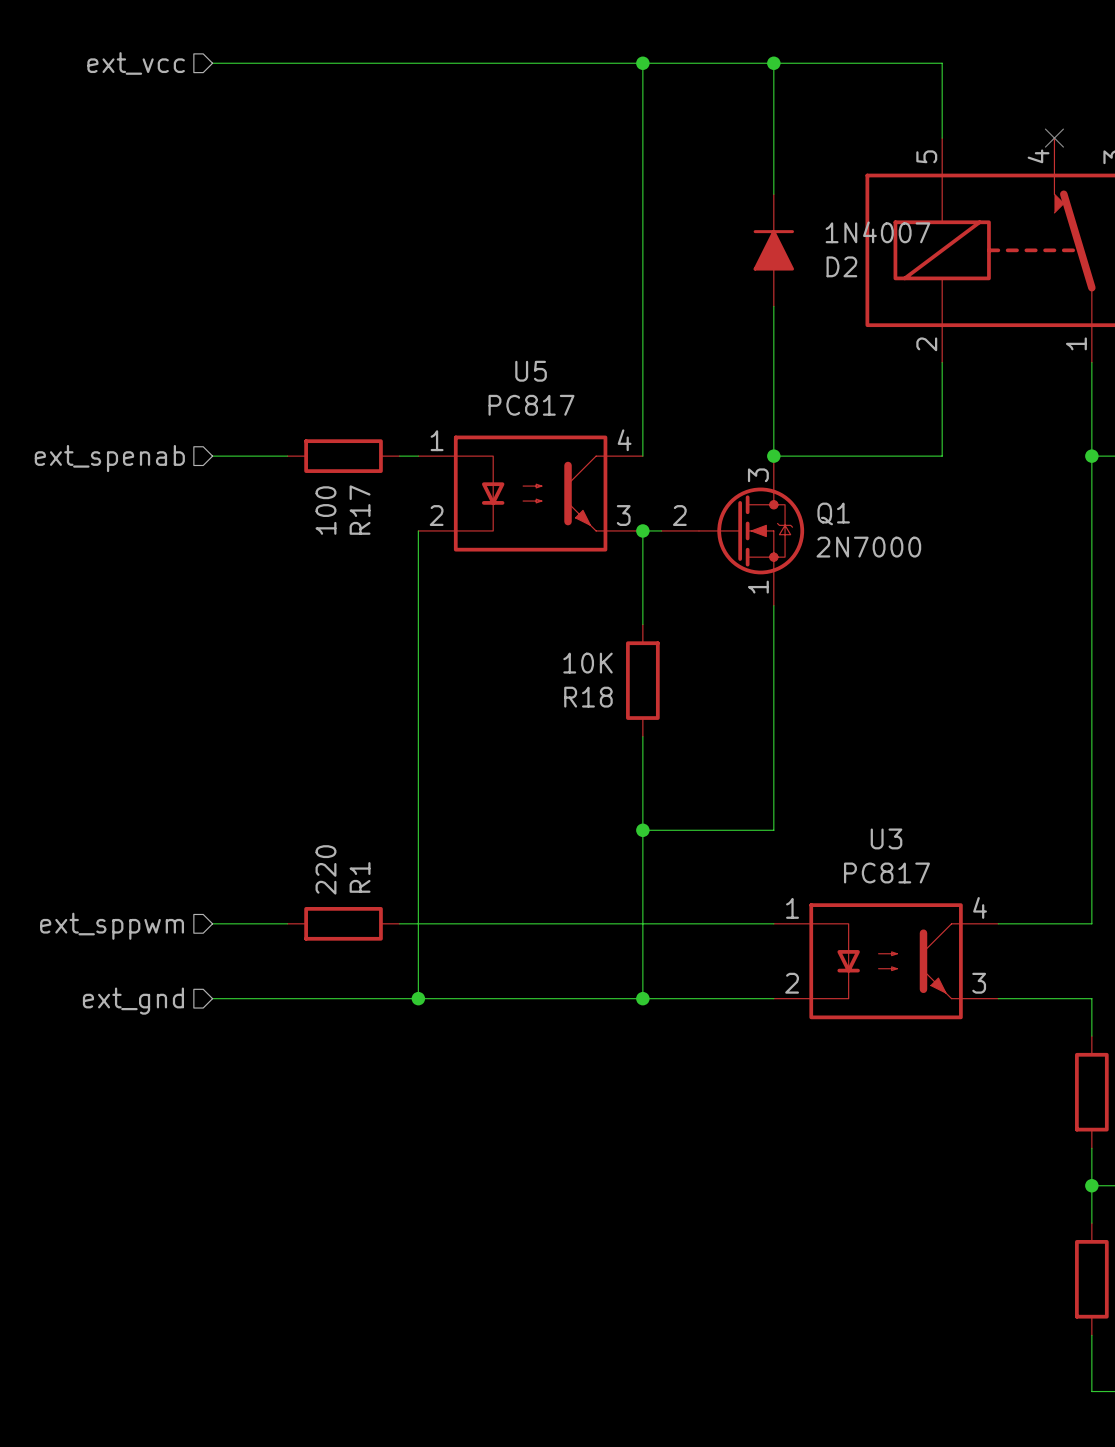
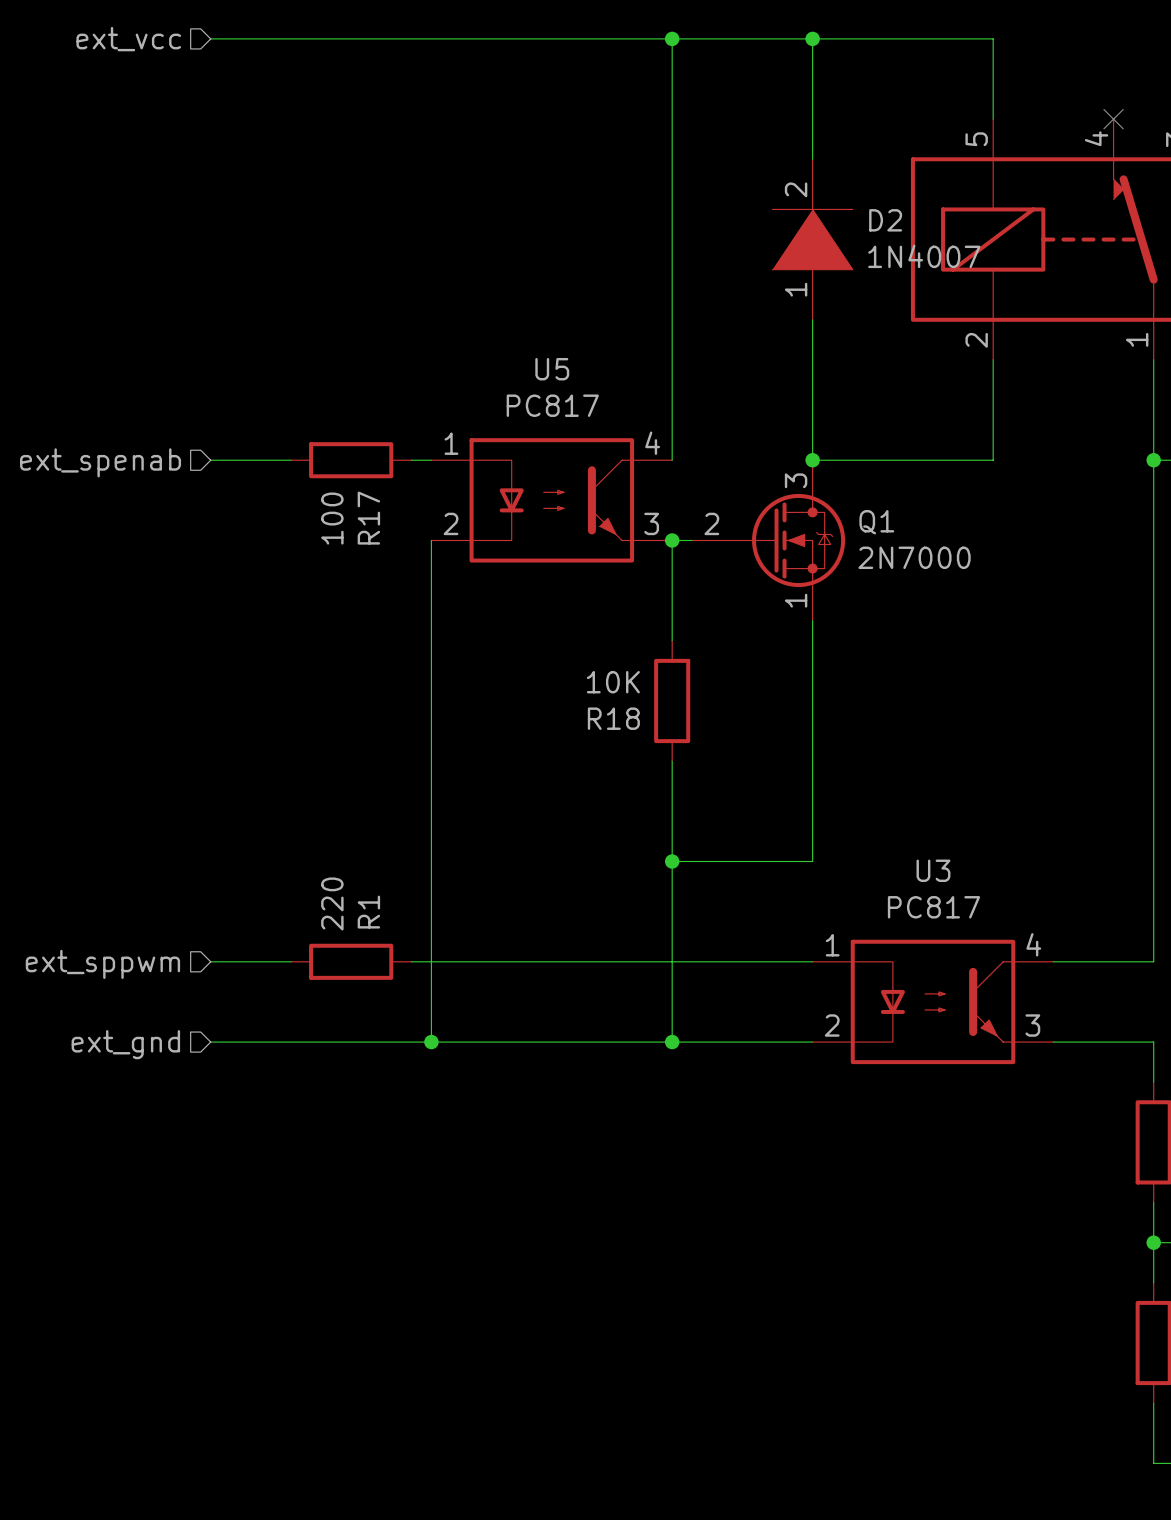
D2 symbol: [753, 194, 795, 307] -> [772, 159, 853, 320]
D2 value position: 1N4007 (877, 232) -> 1N4007 (924, 256)
D2 name position: D2 (841, 266) -> D2 (885, 220)

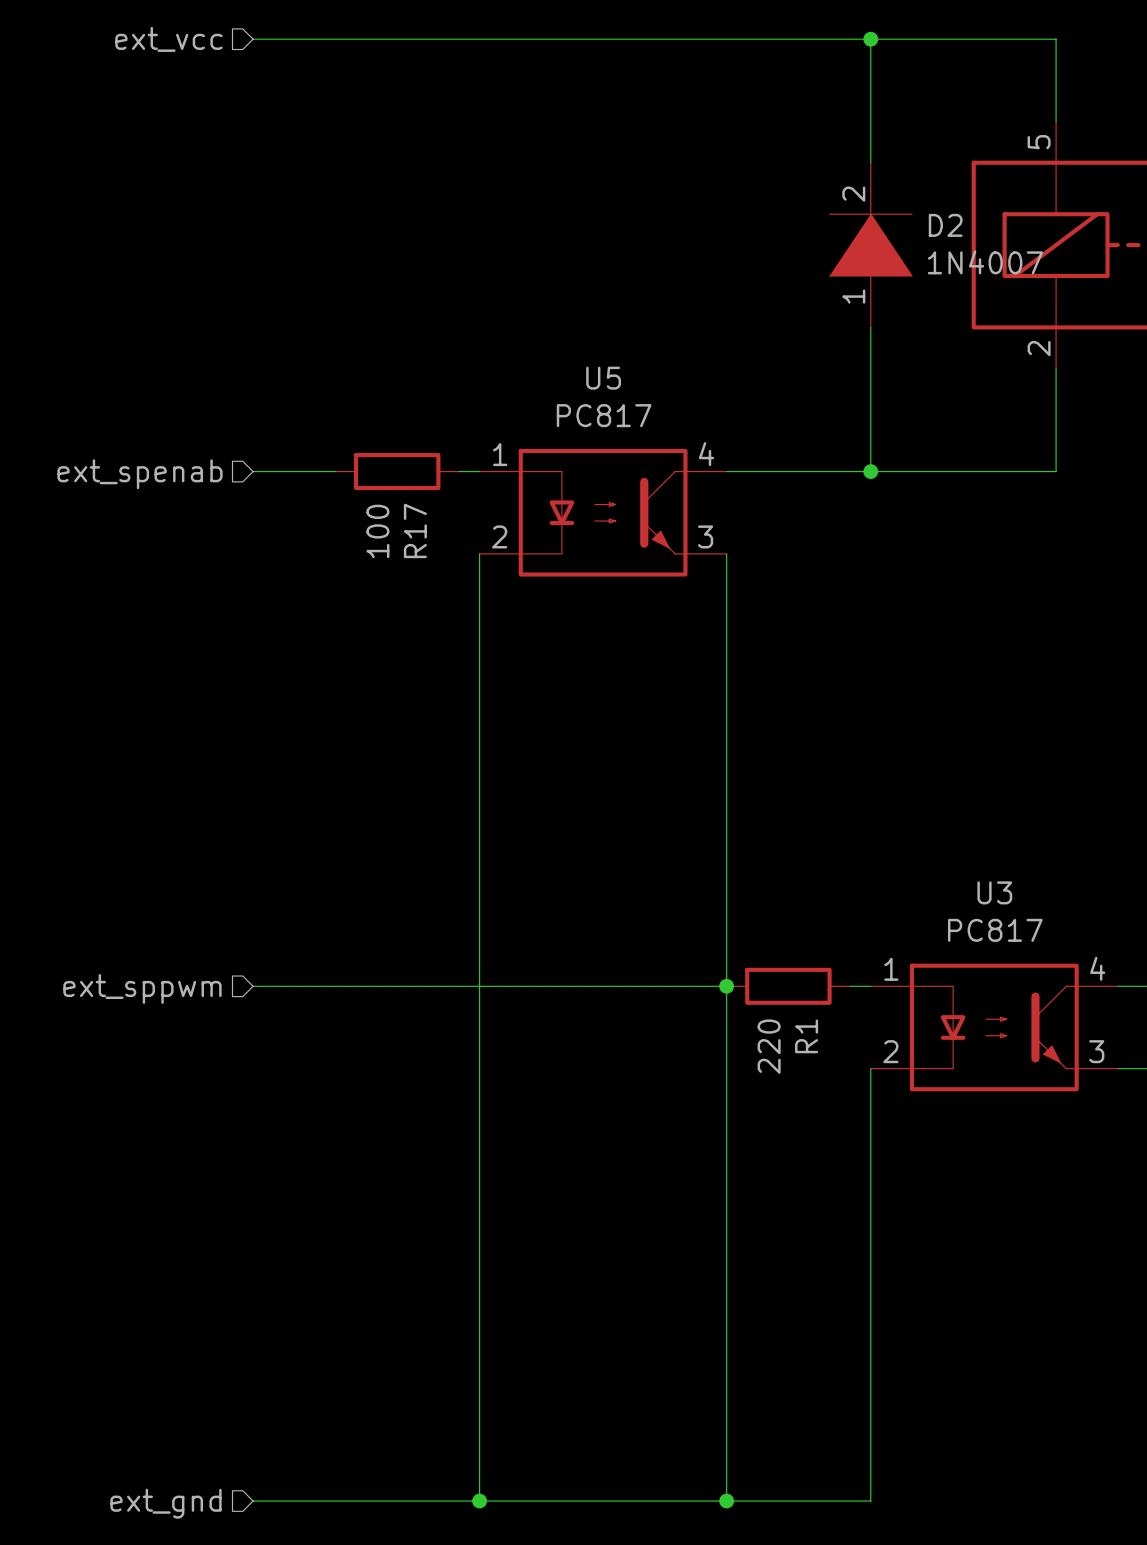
wire: (672, 38) (672, 460) -> (870, 471) (726, 471)
junction: (672, 38) -> none
wire: (672, 540) (692, 540) -> none
junction: (672, 540) -> none
Q1: 2N7000 (768, 540) -> none
wire: (812, 620) (812, 861) (672, 861) -> none
wire: none -> (726, 656) (726, 780)
R18: 10K (672, 700) -> none
junction: (672, 861) -> none
R1 value position: 220 (332, 903) -> 220 (769, 1046)
R1 name position: R1 (368, 912) -> R1 (806, 1036)
R1 position: (351, 961) -> (788, 986)
wire: (672, 961) (792, 961) -> (335, 986) (458, 986)
junction: none -> (726, 986)
wire: (210, 1042) (812, 1042) -> (253, 1501) (870, 1501) (870, 1068)
wire: none -> (479, 1068) (479, 1501)
junction: (431, 1042) -> none
wire: none -> (726, 1068) (726, 1501)
junction: (672, 1042) -> none
hierarchical label: ext_gnd (125, 1044) -> none
junction: none -> (479, 1501)
junction: none -> (726, 1501)
hierarchical label: none -> ext_gnd (166, 1503)

